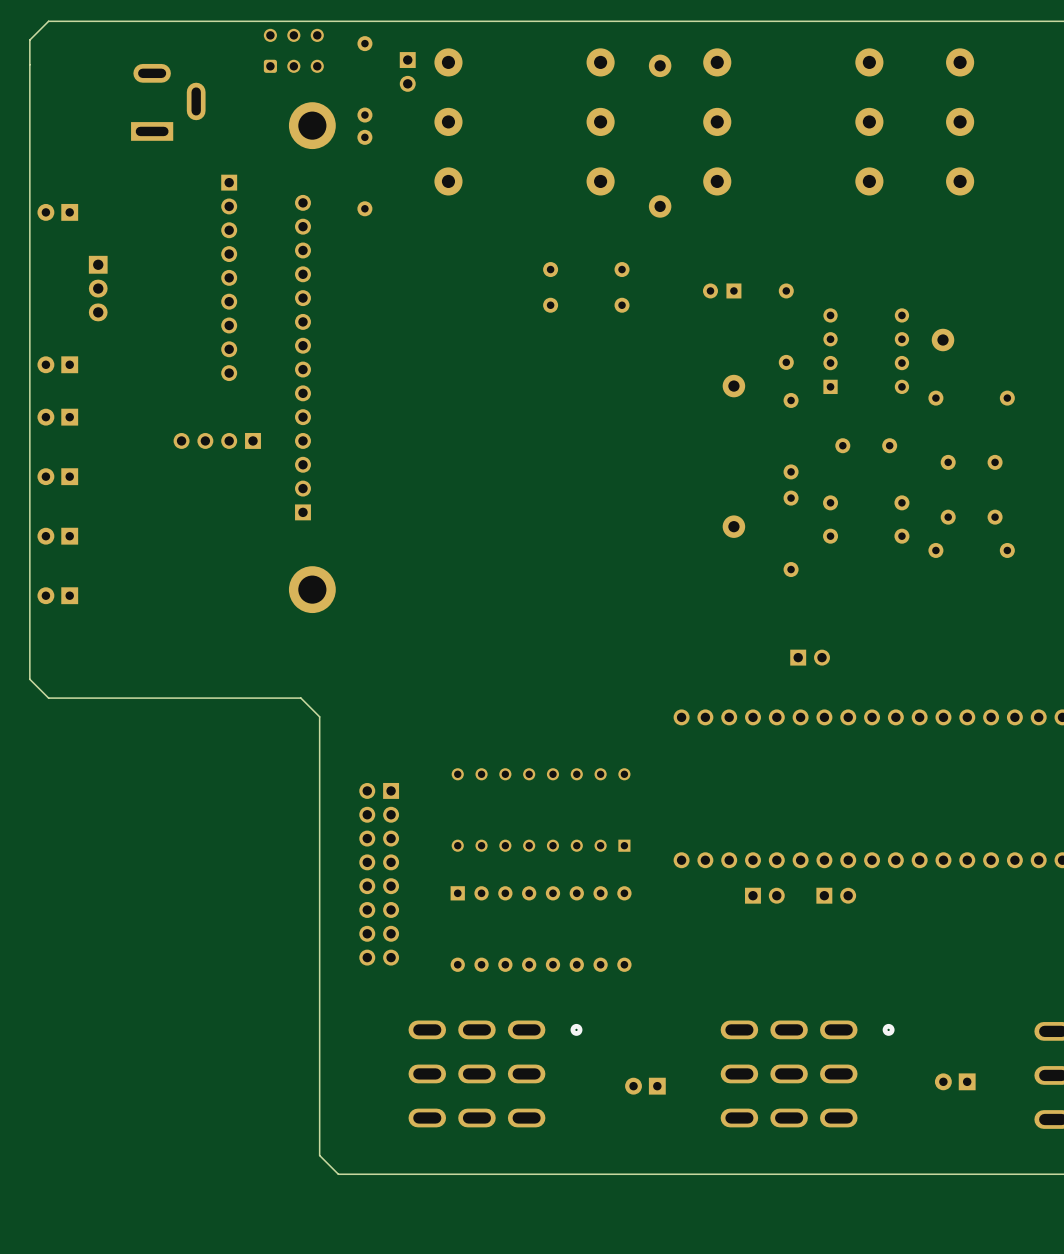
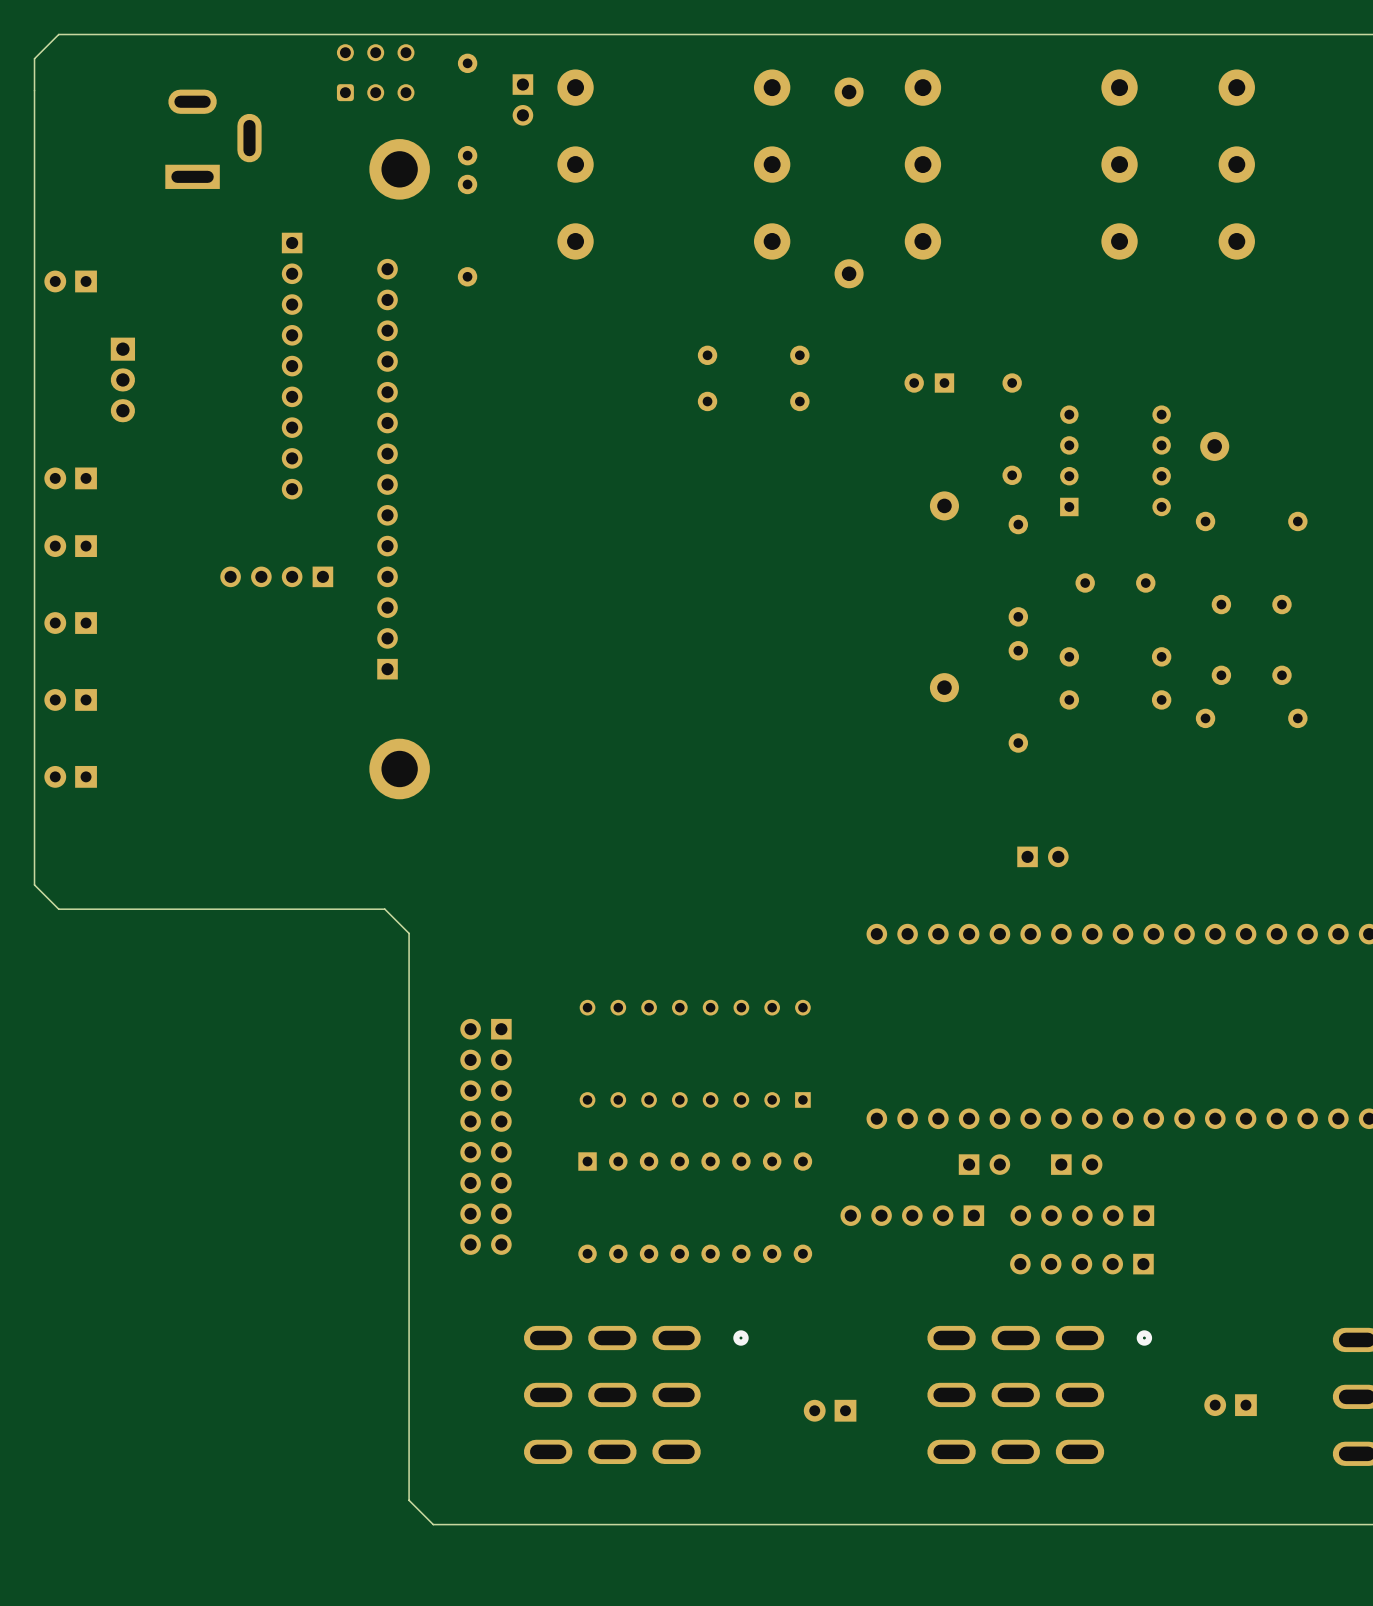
part: none -> (912, 1215)
part: none -> (1082, 1215)
part: none -> (1081, 1264)

